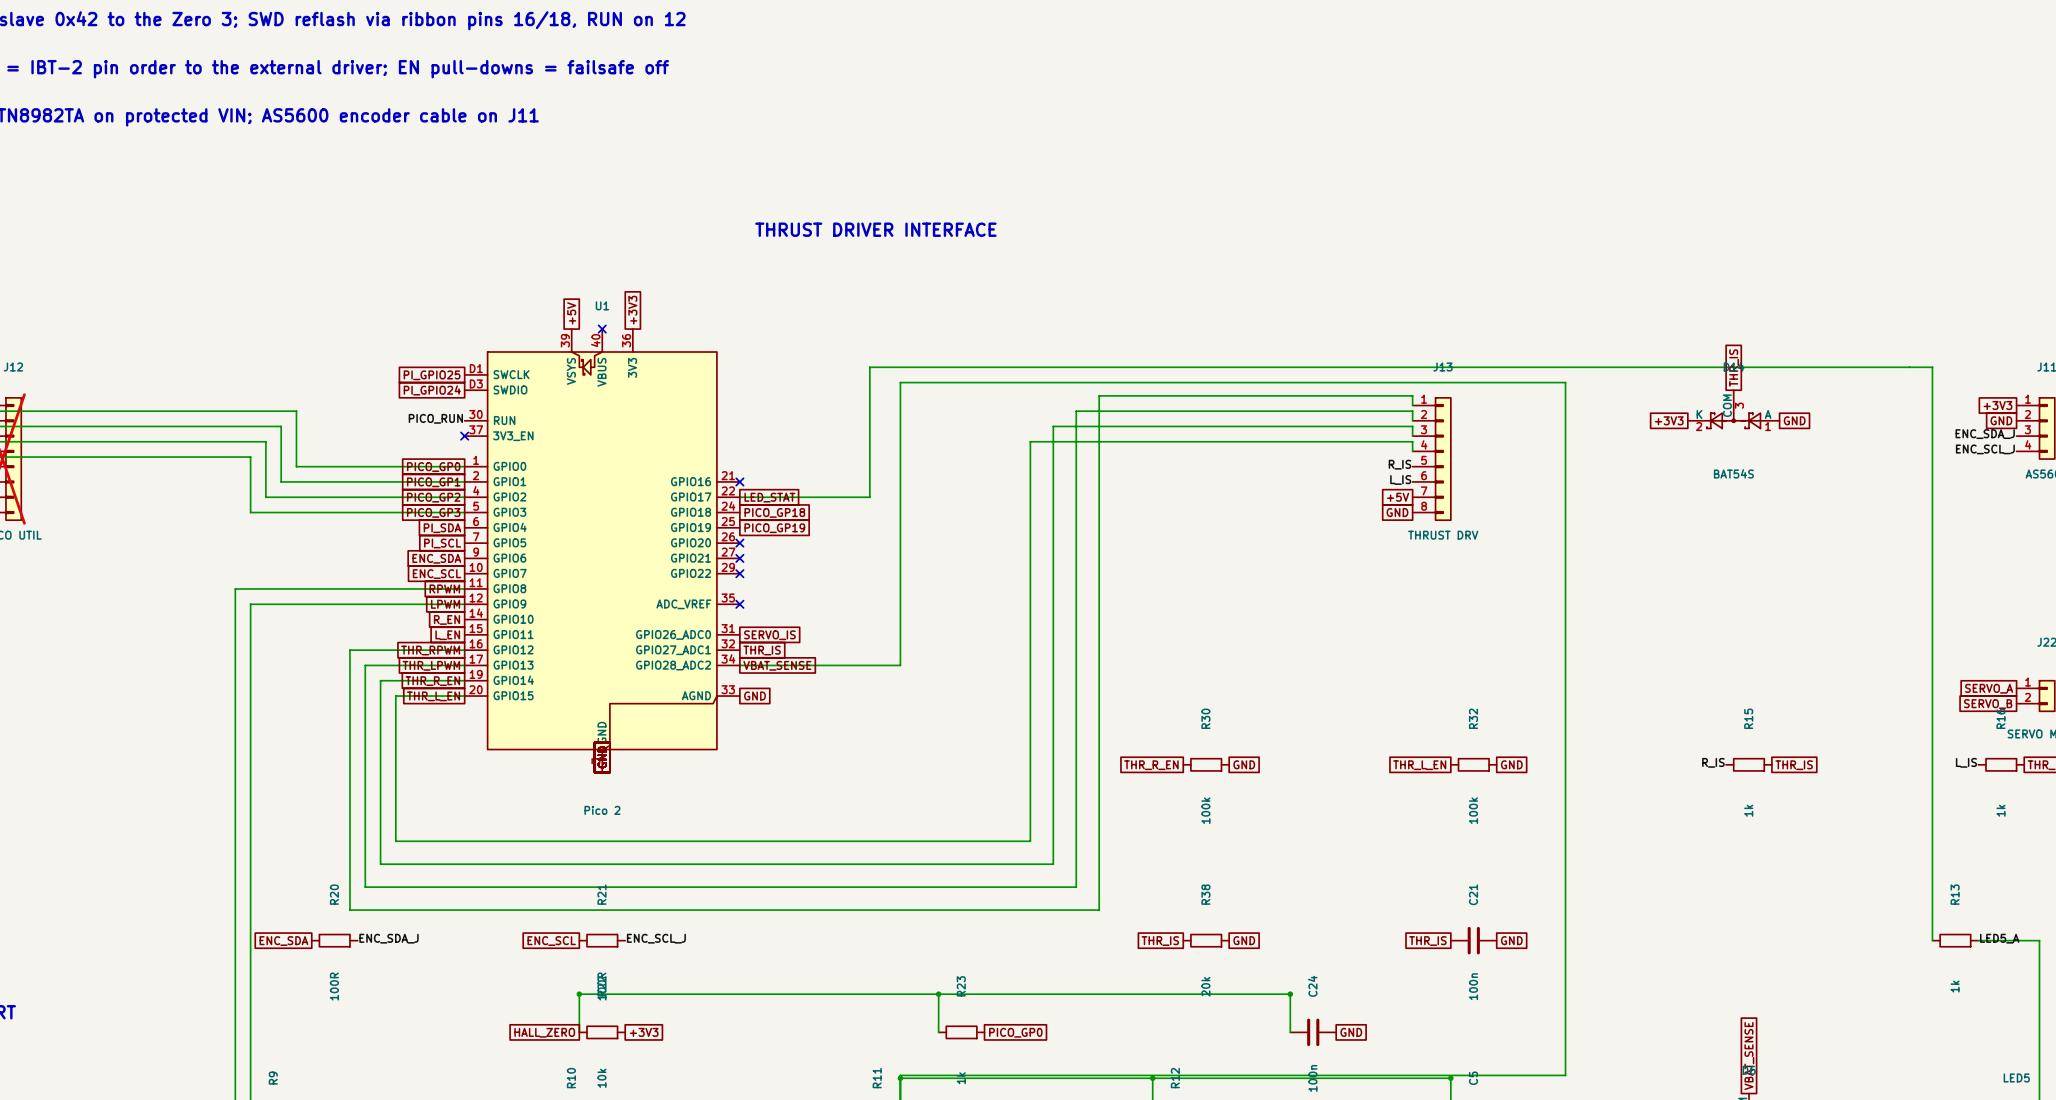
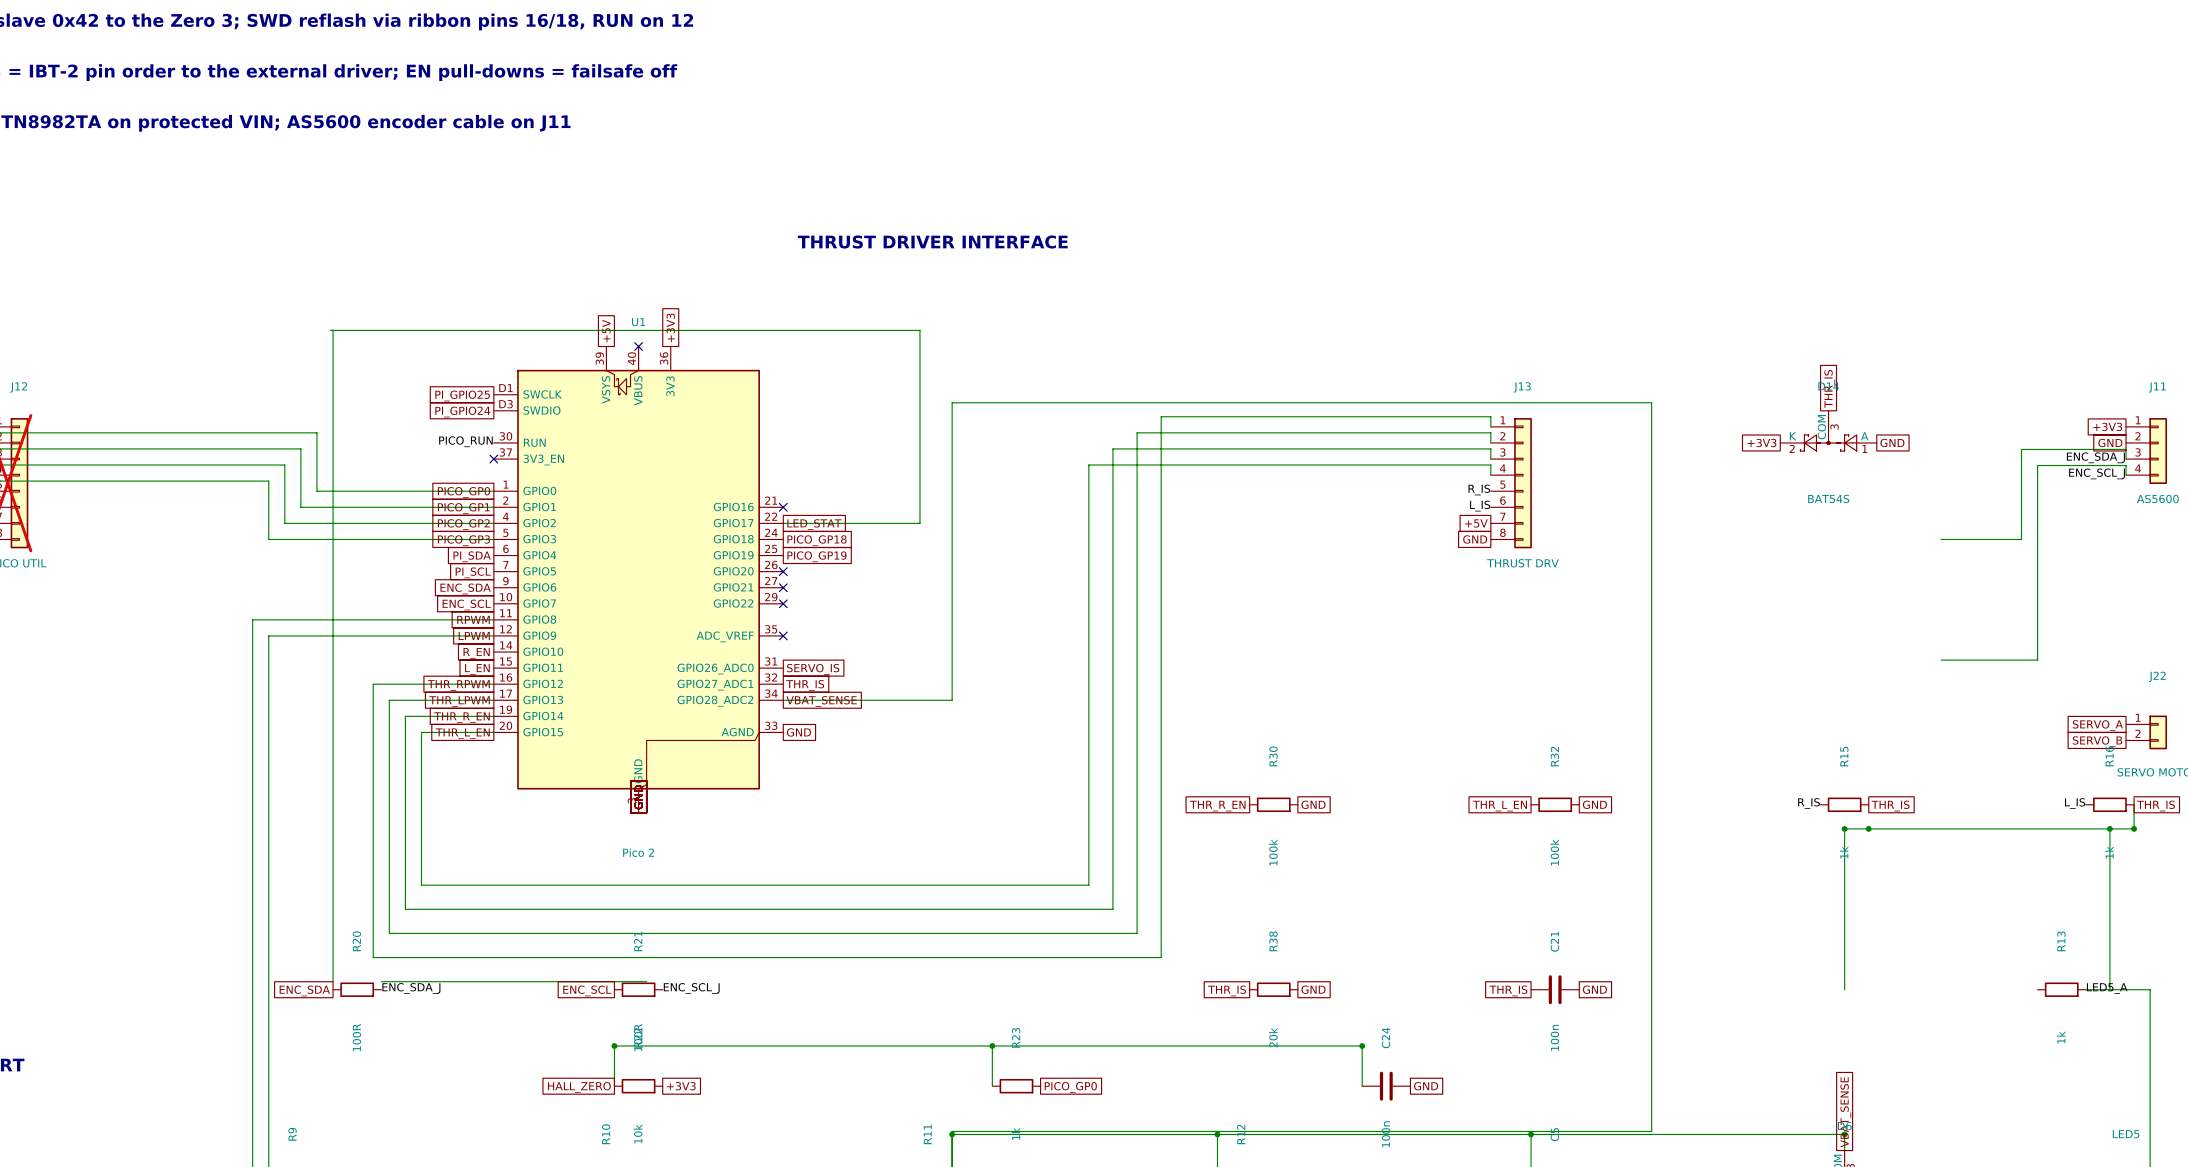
wire: none -> (330, 330) (919, 330) (919, 386)
wire: none -> (333, 330) (333, 981)
wire: (869, 367) (1932, 367) (1932, 442) -> (2126, 475) (2126, 465) (2037, 465)
wire: none -> (2126, 459) (2126, 449) (2021, 449) (2021, 539) (1941, 539)
wire: (1932, 627) (1932, 940) -> (2037, 660) (1941, 660)
wire: none -> (2134, 804) (2134, 828) (1844, 828) (1844, 989)
junction: none -> (1844, 828)
junction: none -> (1868, 828)
wire: none -> (2109, 828) (2109, 989)
junction: none -> (2109, 828)
junction: none -> (2134, 828)
wire: none -> (381, 981) (646, 981)
wire: none -> (1531, 1134) (1844, 1134) (1844, 1150)
junction: none -> (1844, 1134)

